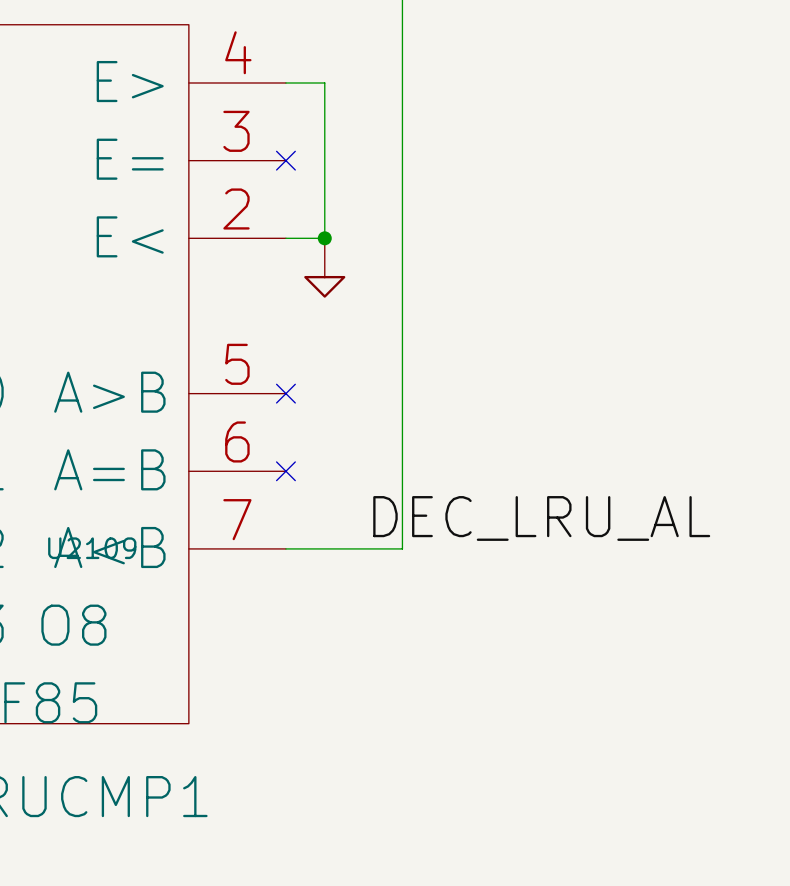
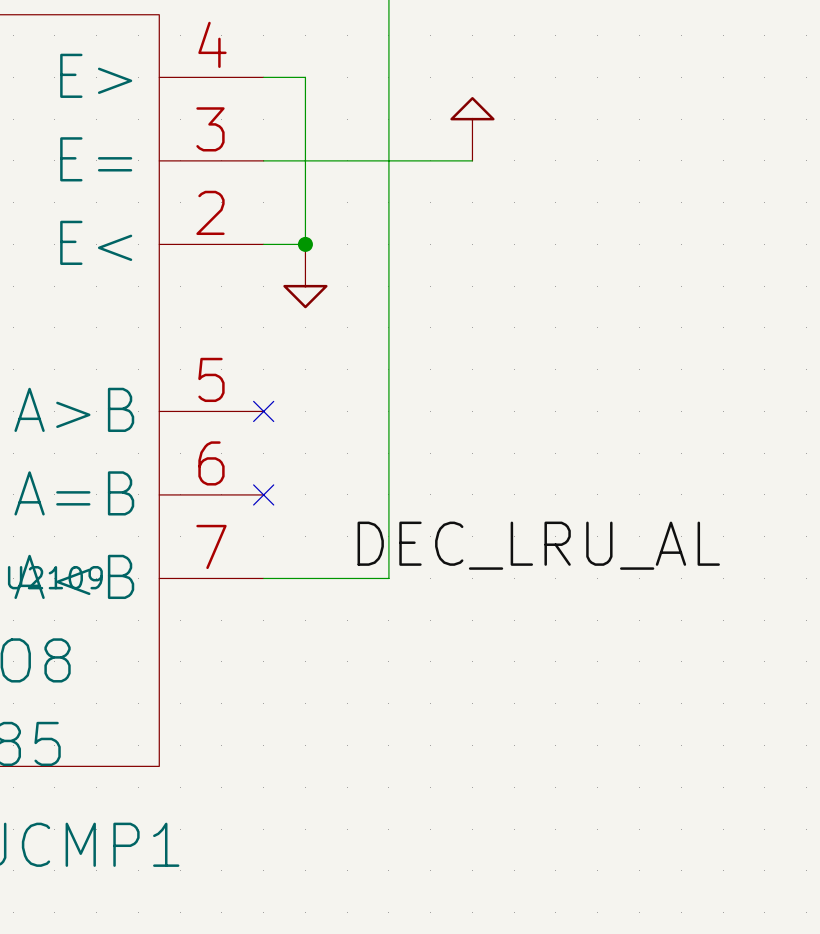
power symbol: none -> (472, 128)
wire: none -> (263, 160) (472, 160)
no-connect mark: (285, 160) -> none

